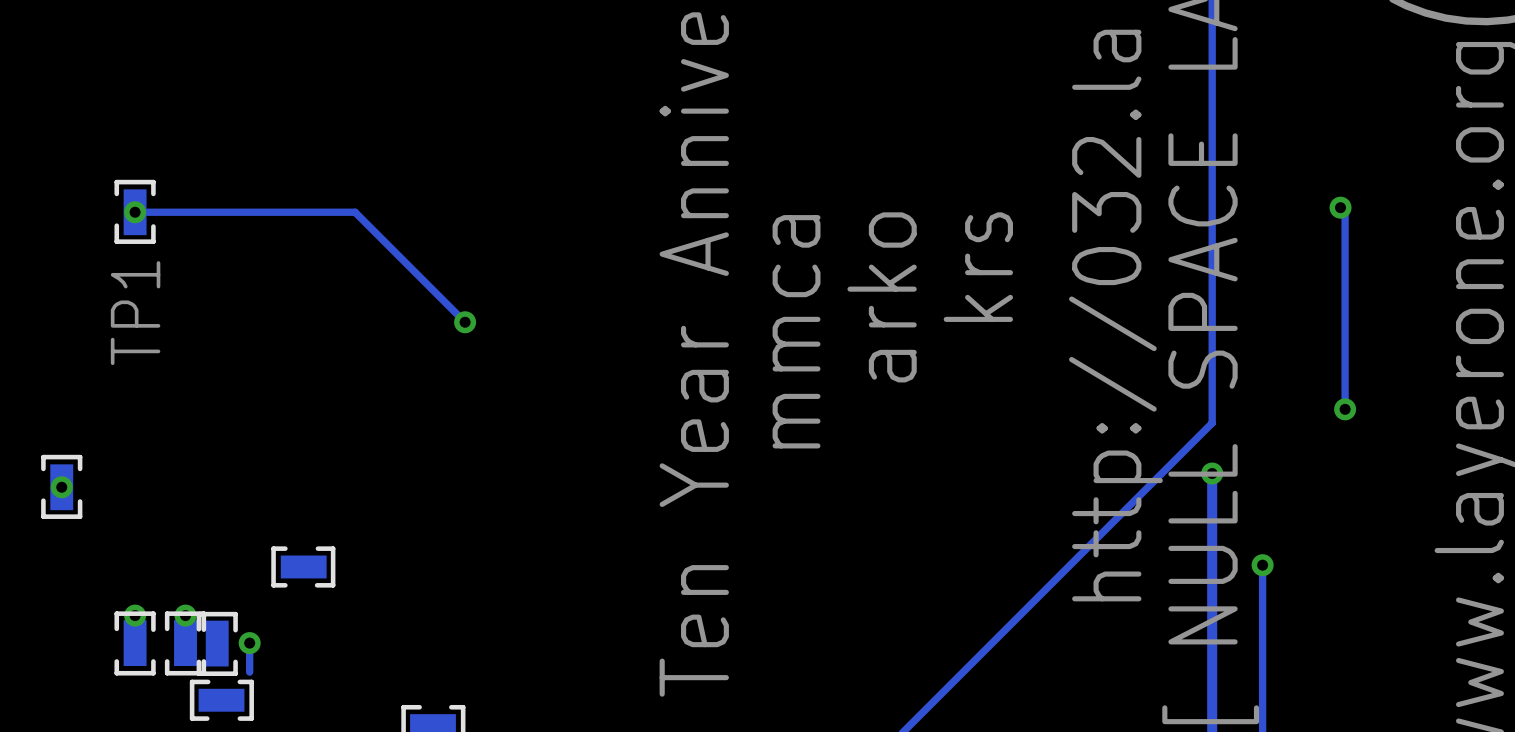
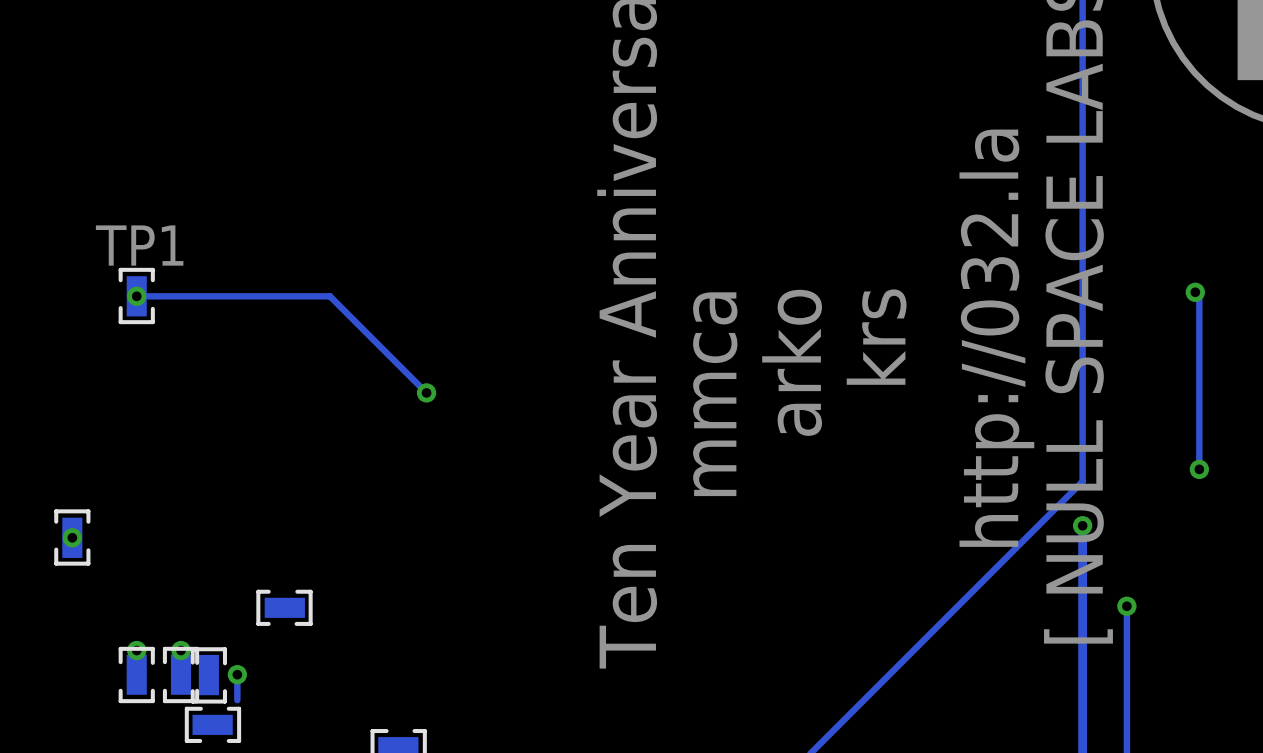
TP1 name rotation: 0° (135, 313) -> 90° clockwise (139, 245)
TP1 name position: TP1 (135, 313) -> TP1 (139, 245)

